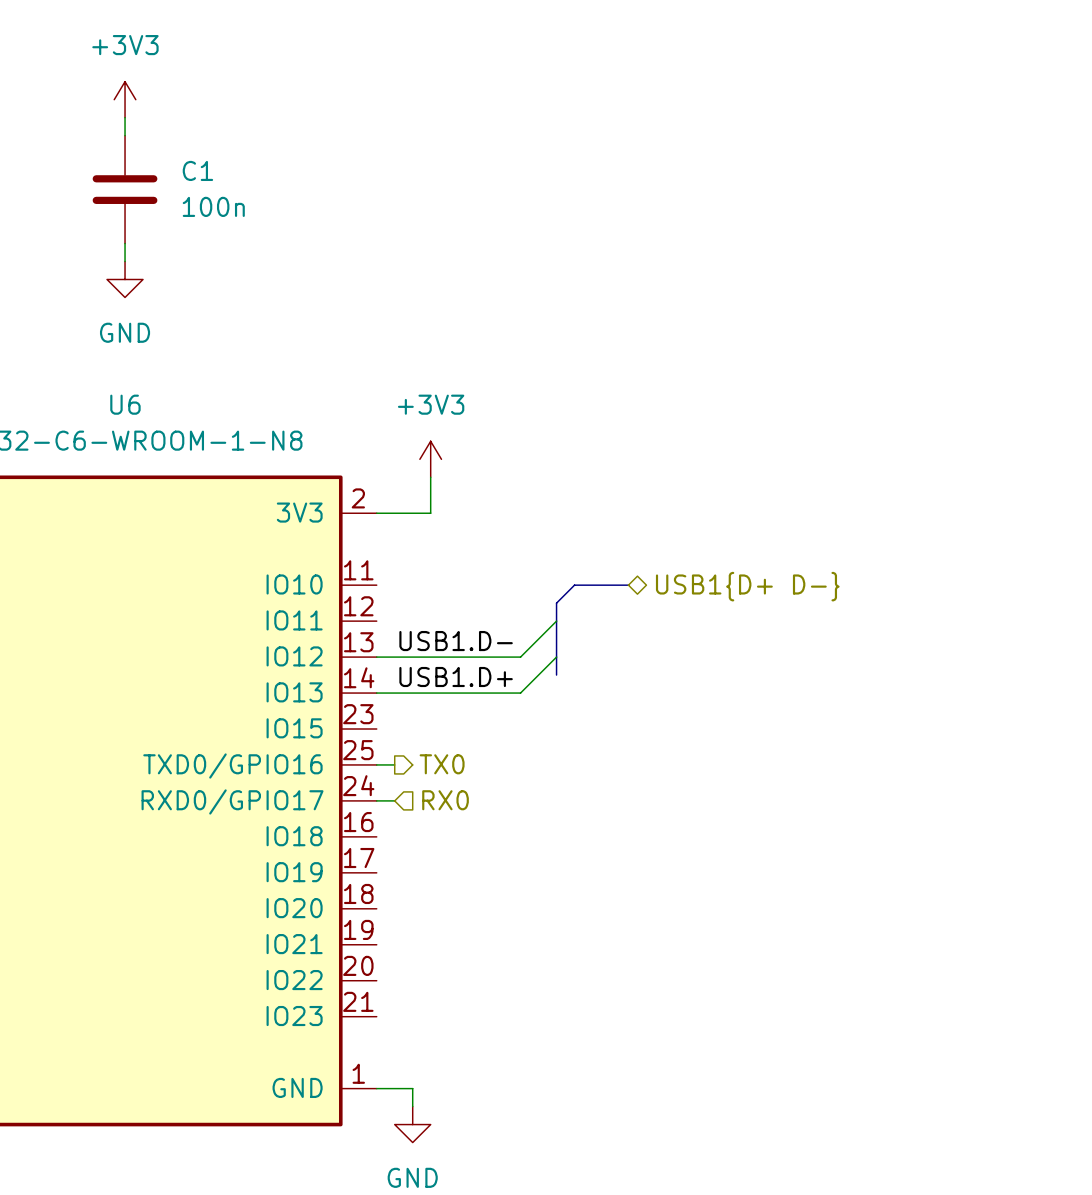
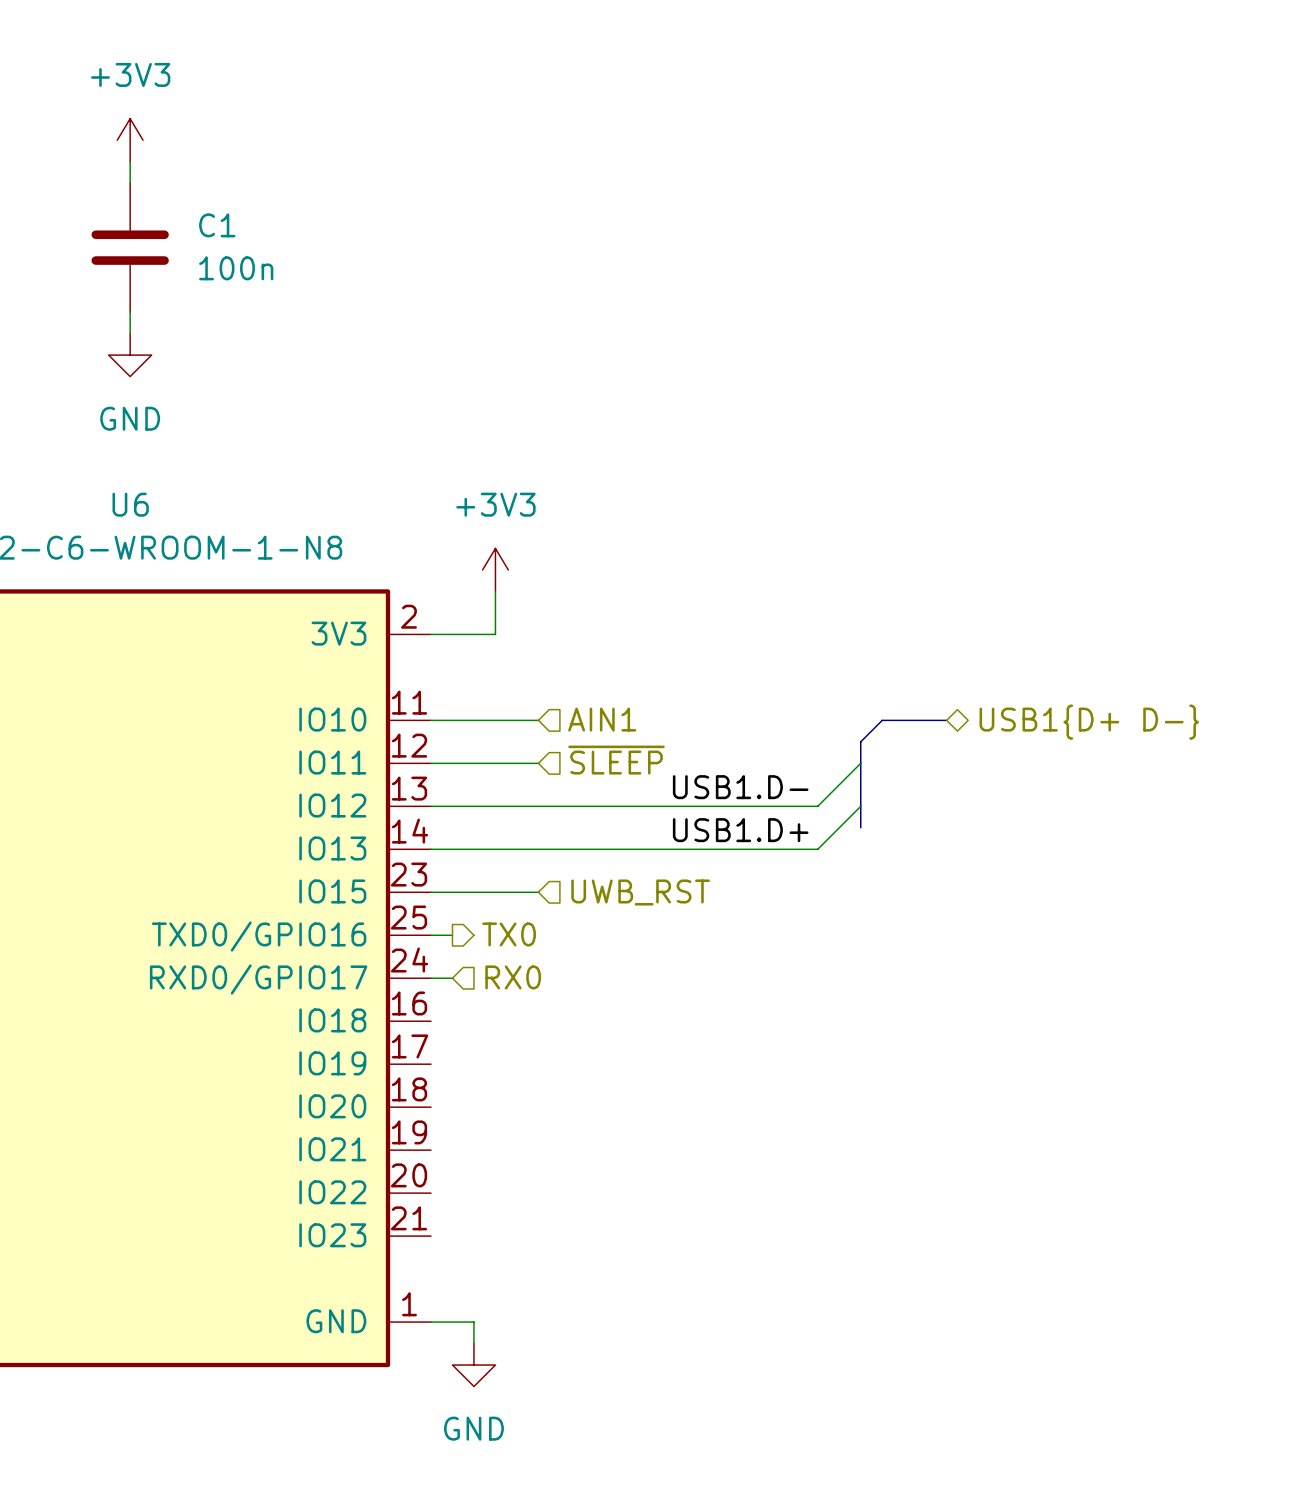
hierarchical label: none -> AIN1 (602, 719)
wire: none -> (430, 720) (538, 720)
bus: (628, 585) (574, 585) (556, 603) (556, 675) -> (946, 720) (882, 720) (860, 741) (860, 827)
hierarchical label position: USB1{D+ D-} (747, 586) -> USB1{D+ D-} (1089, 722)
hierarchical label: none -> ~{SLEEP} (616, 760)
wire: none -> (430, 763) (538, 763)
wire: (556, 621) (520, 657) -> (860, 763) (817, 806) (602, 806)
label position: USB1.D- (456, 641) -> USB1.D- (740, 787)
wire: (556, 657) (520, 693) -> (860, 806) (817, 849) (602, 849)
label position: USB1.D+ (456, 676) -> USB1.D+ (740, 830)
wire: none -> (430, 892) (538, 892)
hierarchical label: none -> UWB_RST (640, 892)

